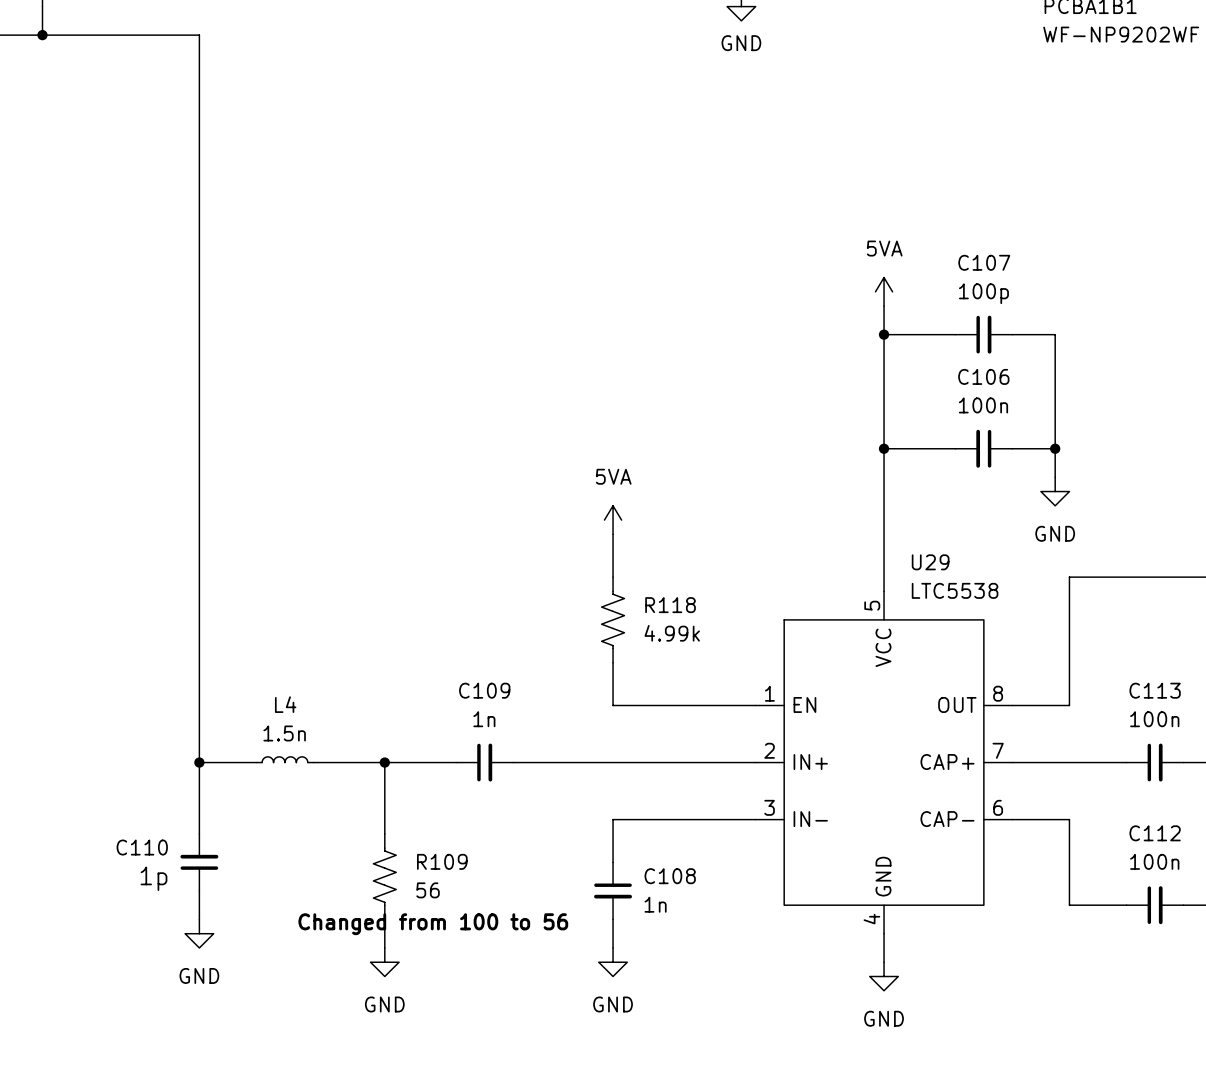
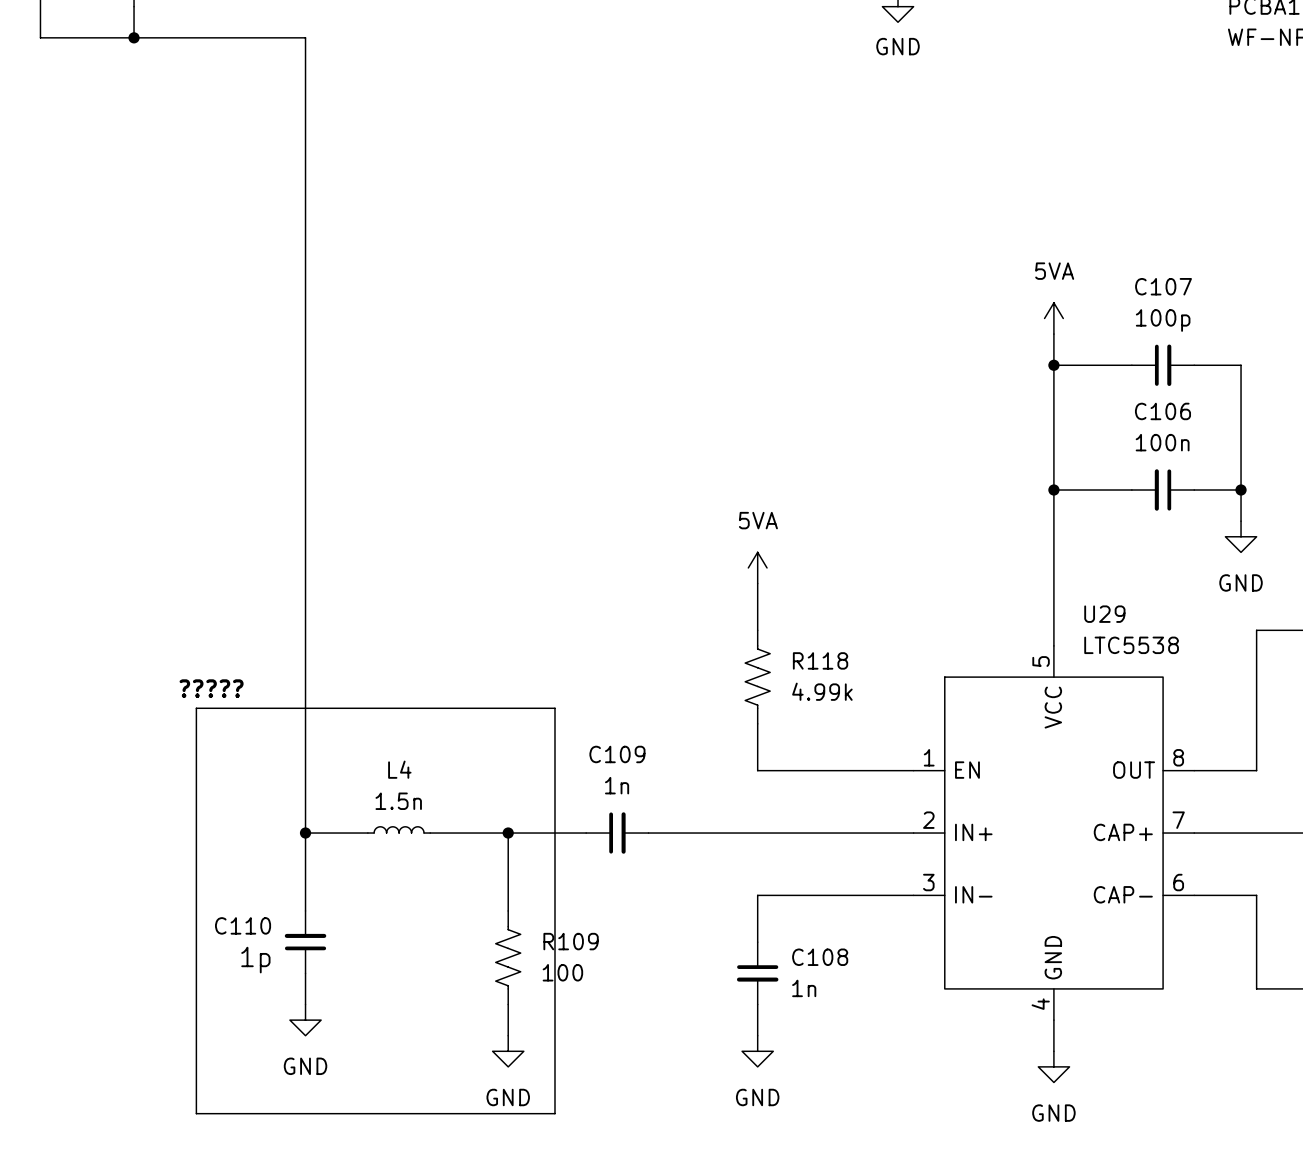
text: none -> ????? (211, 688)
line: none -> (196, 708) (554, 708) (554, 1113) (196, 1113) (196, 708)
R109 value: 56 (428, 890) -> 100 (562, 972)
text: Changed from 100 to 56 (433, 924) -> none

